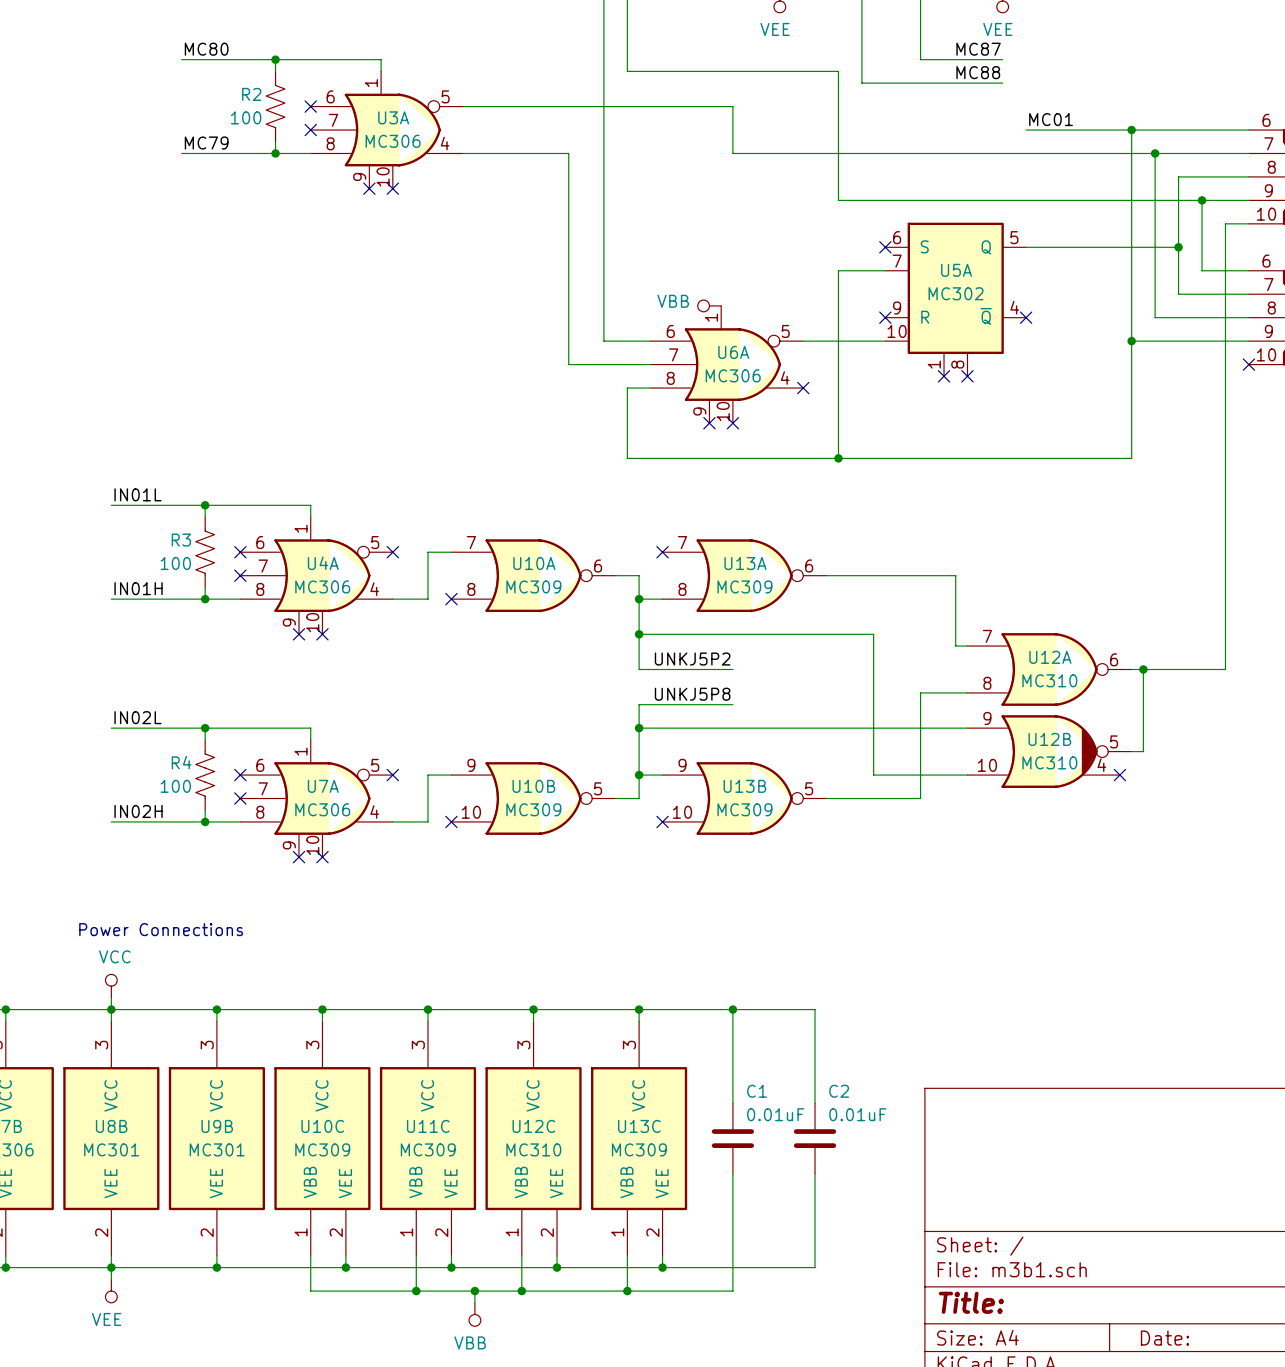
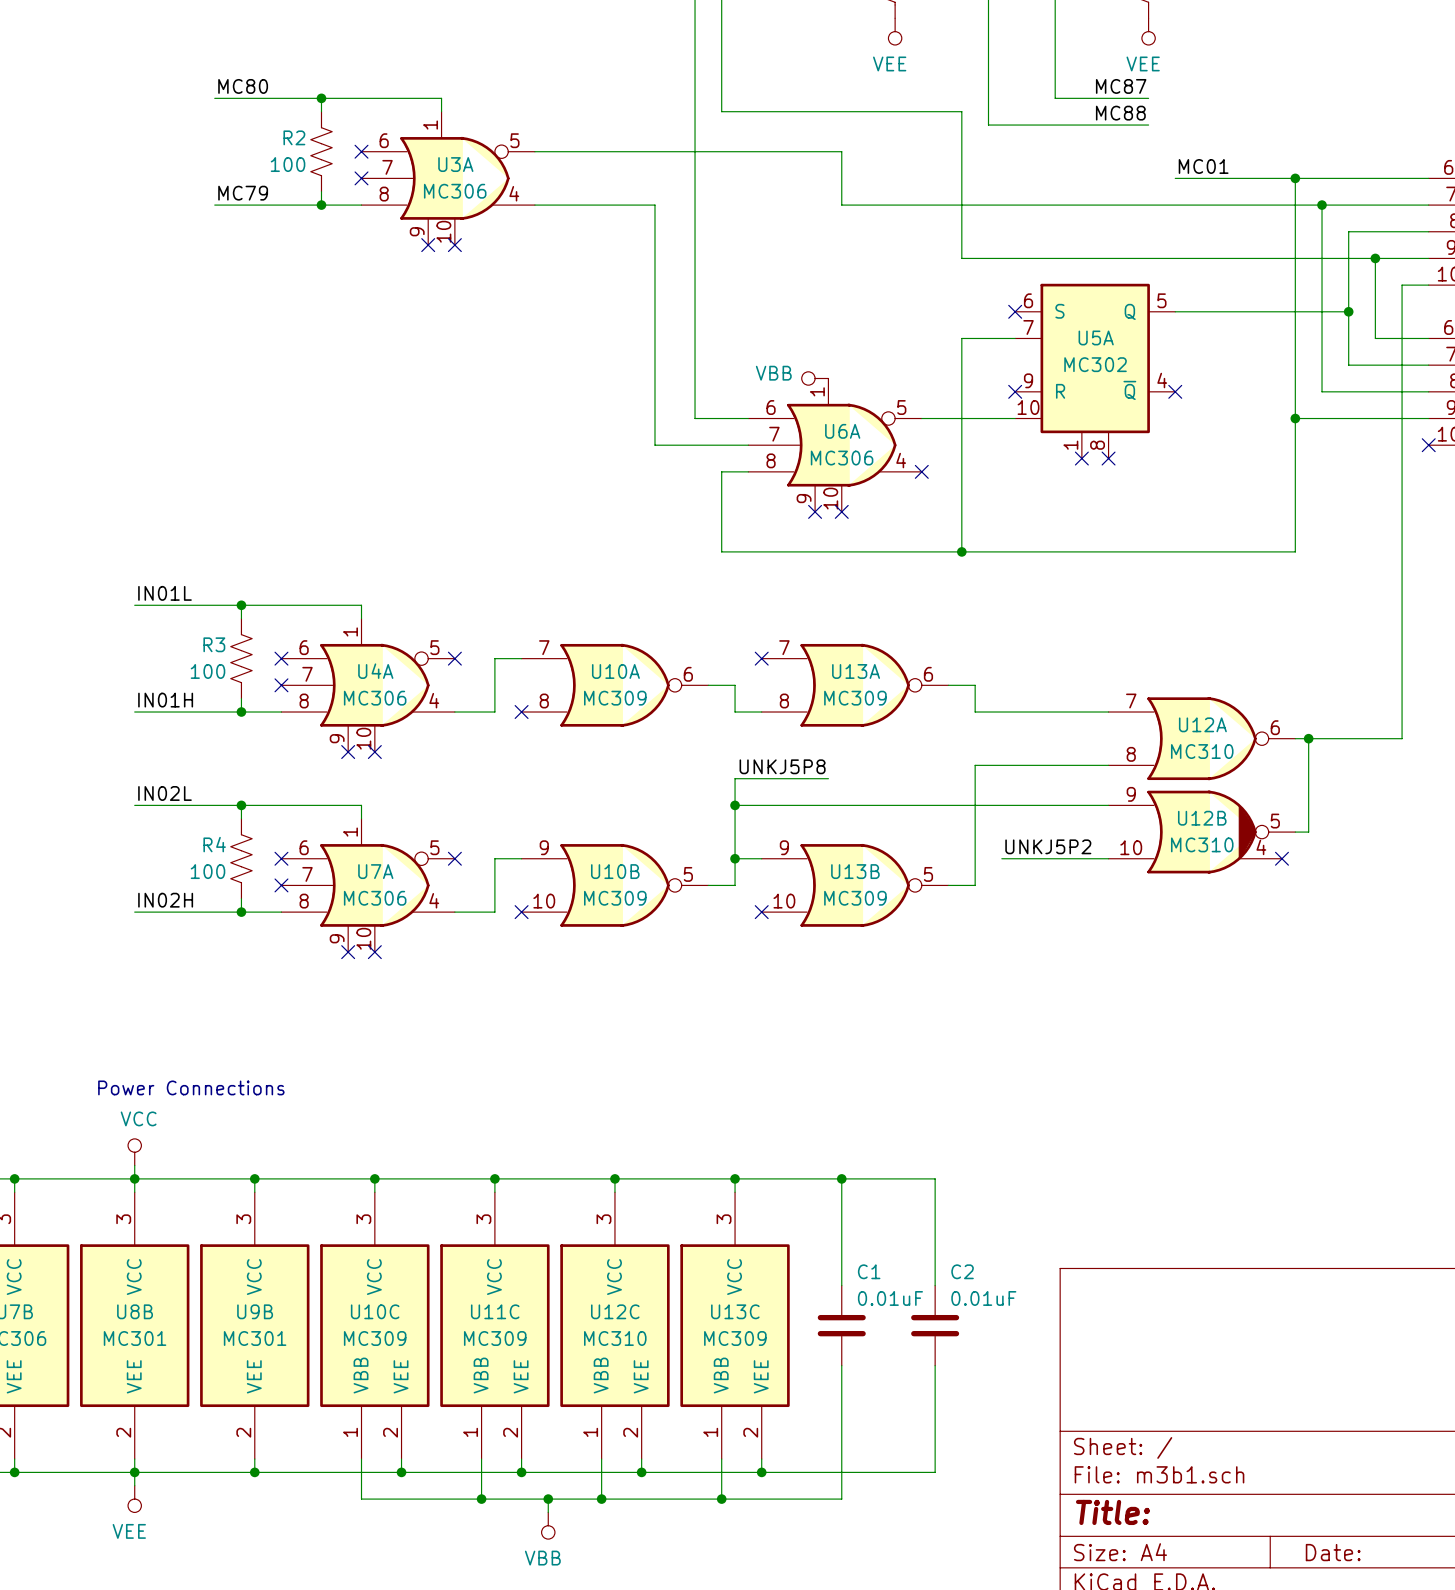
wire: (850, 575) (955, 575) (955, 646) -> (975, 685) (975, 712) (1108, 712)
wire: (639, 599) (639, 657) -> (828, 778) (735, 778)
junction: (639, 599) -> none
wire: none -> (1308, 738) (1308, 792)
wire: (1225, 622) (1225, 669) (1131, 669) -> (1402, 738) (1295, 738)
wire: (639, 634) (873, 634) (873, 775) (967, 775) -> none
junction: (639, 634) -> none
wire: none -> (1095, 765) (975, 765) (975, 885) (948, 885)
label position: UNKJ5P2 (692, 659) -> UNKJ5P2 (1048, 846)
wire: (639, 669) (732, 669) -> (735, 792) (735, 832)
U12A position: (1049, 669) -> (1201, 738)
junction position: (1143, 669) -> (1308, 738)
junction: none -> (241, 805)
wire: none -> (735, 805) (1108, 805)
junction: none -> (735, 805)
wire: (967, 692) (920, 692) (920, 798) (826, 798) -> none
label position: UNKJ5P8 (692, 694) -> UNKJ5P8 (782, 766)
wire: (639, 704) (732, 704) -> none
wire: (1143, 704) (1143, 751) (1131, 751) -> (1308, 832) (1295, 832)
label position: IN02L (137, 717) -> IN02L (165, 793)
wire: (111, 728) (310, 728) (310, 739) -> (134, 805) (361, 805) (361, 818)
wire: (205, 728) (205, 739) -> (241, 805) (241, 818)
junction: (205, 728) -> none
no-connect mark: none -> (281, 858)
no-connect mark: none -> (454, 858)
wire: (662, 728) (873, 728) -> none
no-connect mark: none -> (281, 885)
wire: (639, 751) (639, 798) (615, 798) -> (735, 885) (708, 885)
U12B position: (1049, 751) -> (1201, 832)
R4 position: (205, 775) -> (241, 858)
junction: none -> (241, 912)
no-connect mark: (240, 775) -> none
no-connect mark: (392, 775) -> none
wire: (451, 775) (428, 775) (428, 821) (392, 821) -> (521, 858) (494, 858) (494, 912) (454, 912)
no-connect mark: none -> (521, 912)
wire: (639, 775) (662, 775) -> none
junction: (639, 775) -> none
no-connect mark position: (1119, 775) -> (1281, 858)
no-connect mark: (240, 798) -> none
U7A position: (316, 798) -> (368, 885)
U10B position: (533, 798) -> (614, 885)
U13B position: (744, 798) -> (855, 885)
wire: (205, 810) (205, 821) -> (241, 898) (241, 912)
no-connect mark: none -> (348, 952)
no-connect mark: none -> (374, 952)
label position: IN02H (138, 811) -> IN02H (165, 900)
wire: (111, 821) (240, 821) -> (134, 912) (281, 912)
junction: (205, 821) -> none
no-connect mark: (451, 821) -> none
no-connect mark position: (662, 821) -> (761, 912)
no-connect mark: (299, 857) -> none
no-connect mark: (322, 857) -> none

